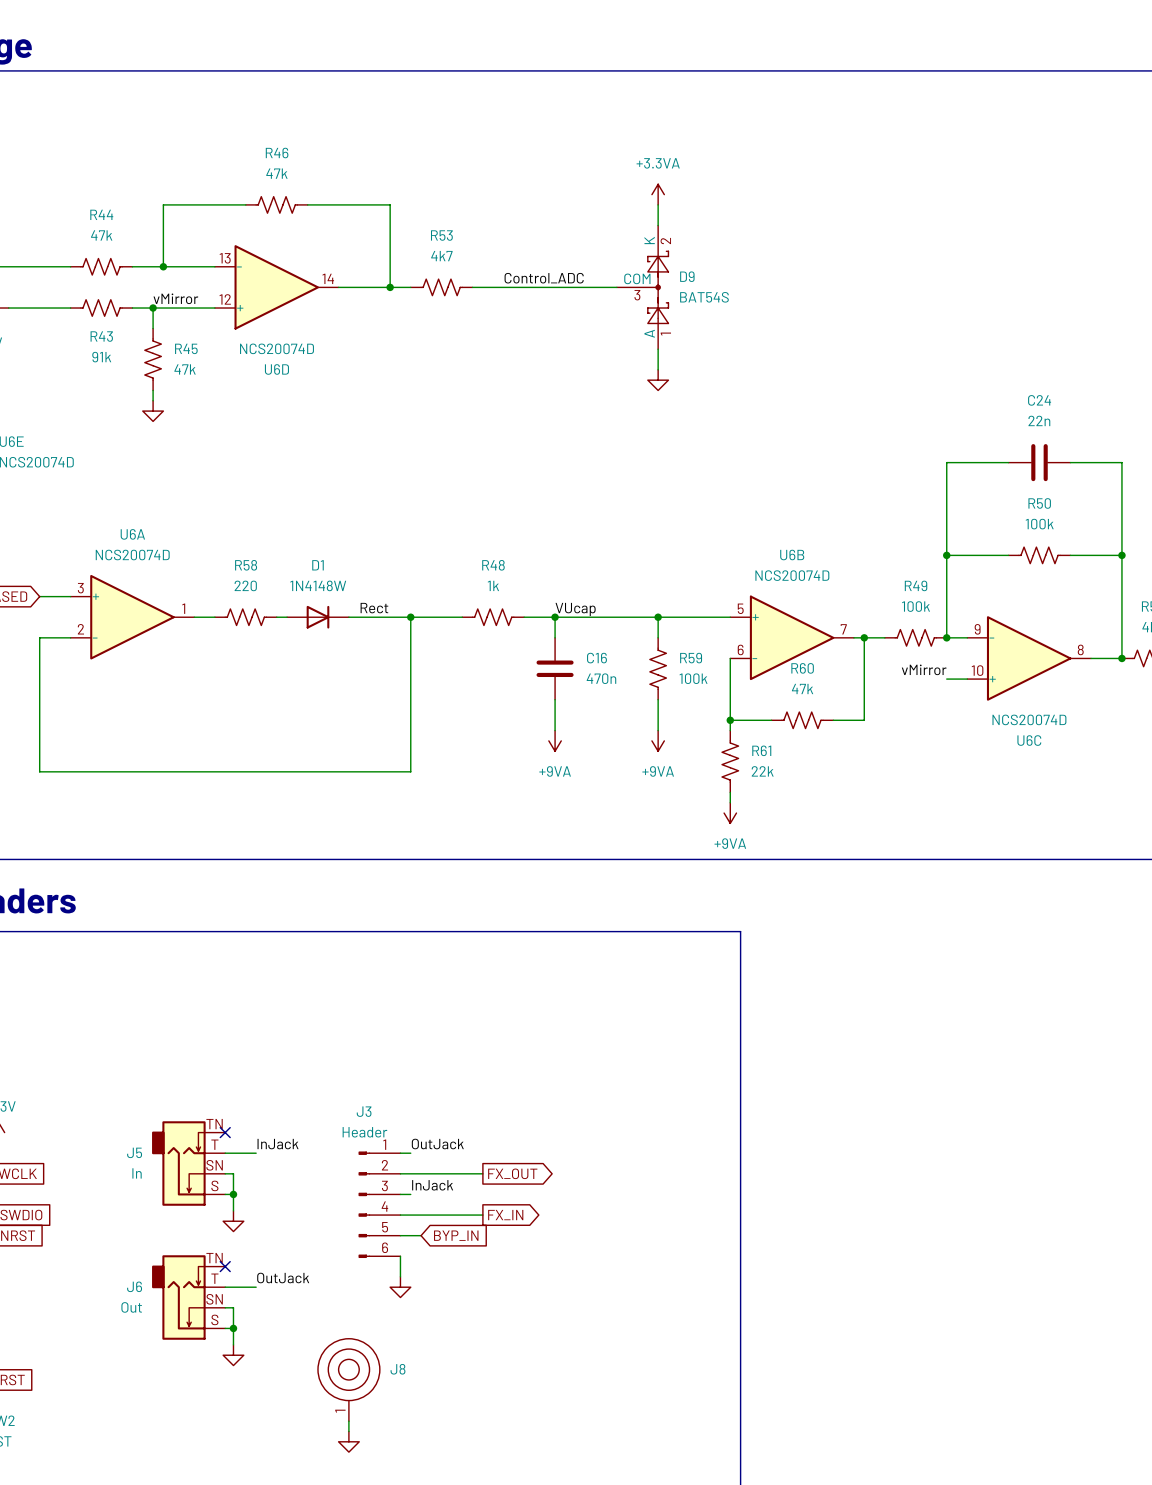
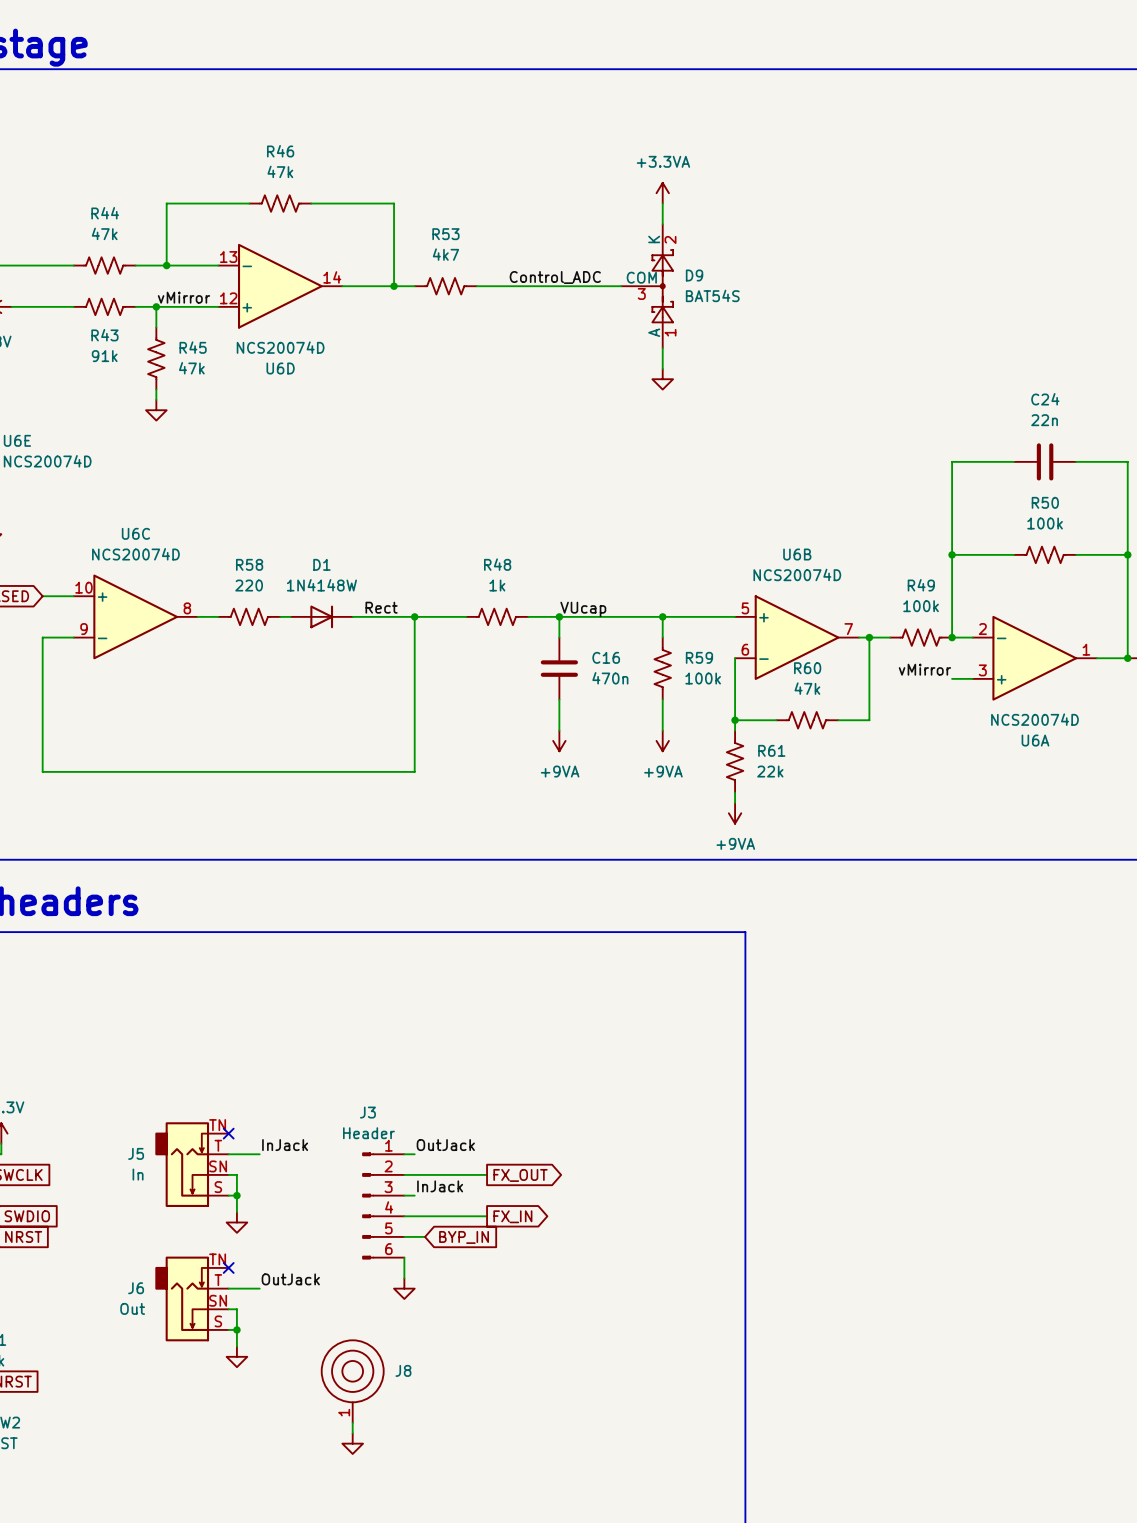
U6A flip: as is (132, 617) -> up-down (1034, 658)
U6A position: (132, 617) -> (1034, 658)
U6C flip: as is (1029, 658) -> up-down (135, 616)
U6C position: (1029, 658) -> (135, 616)

